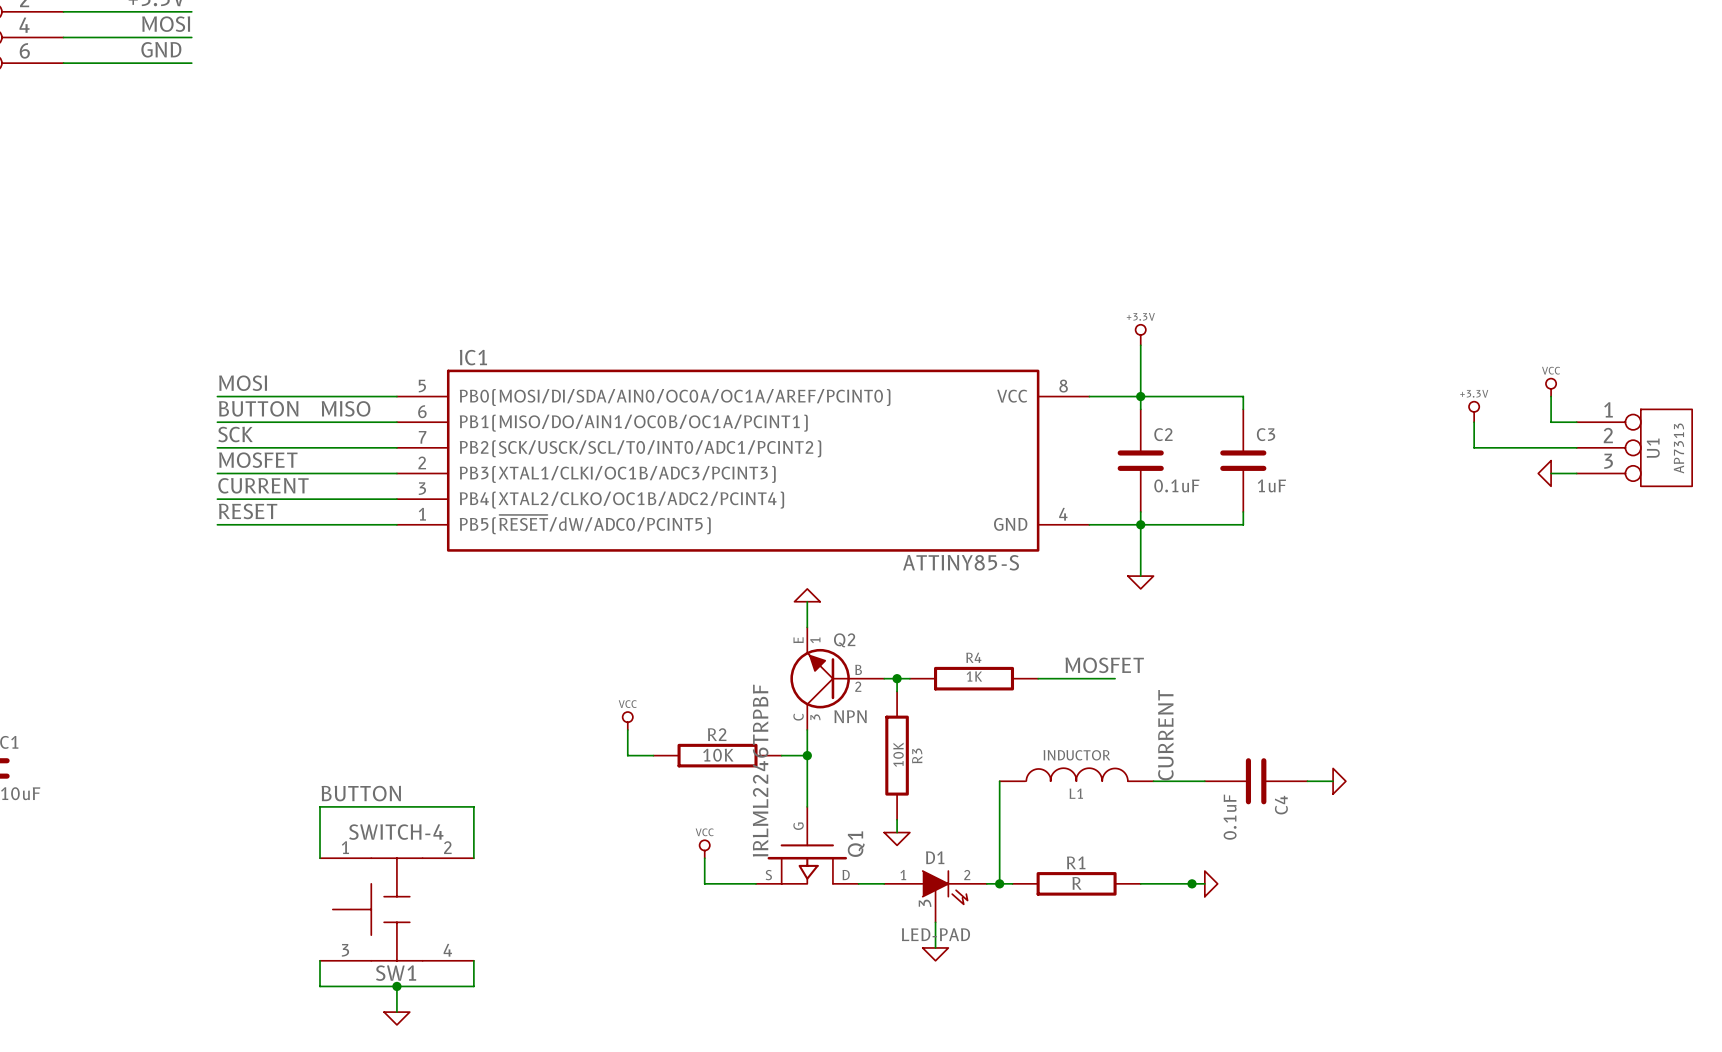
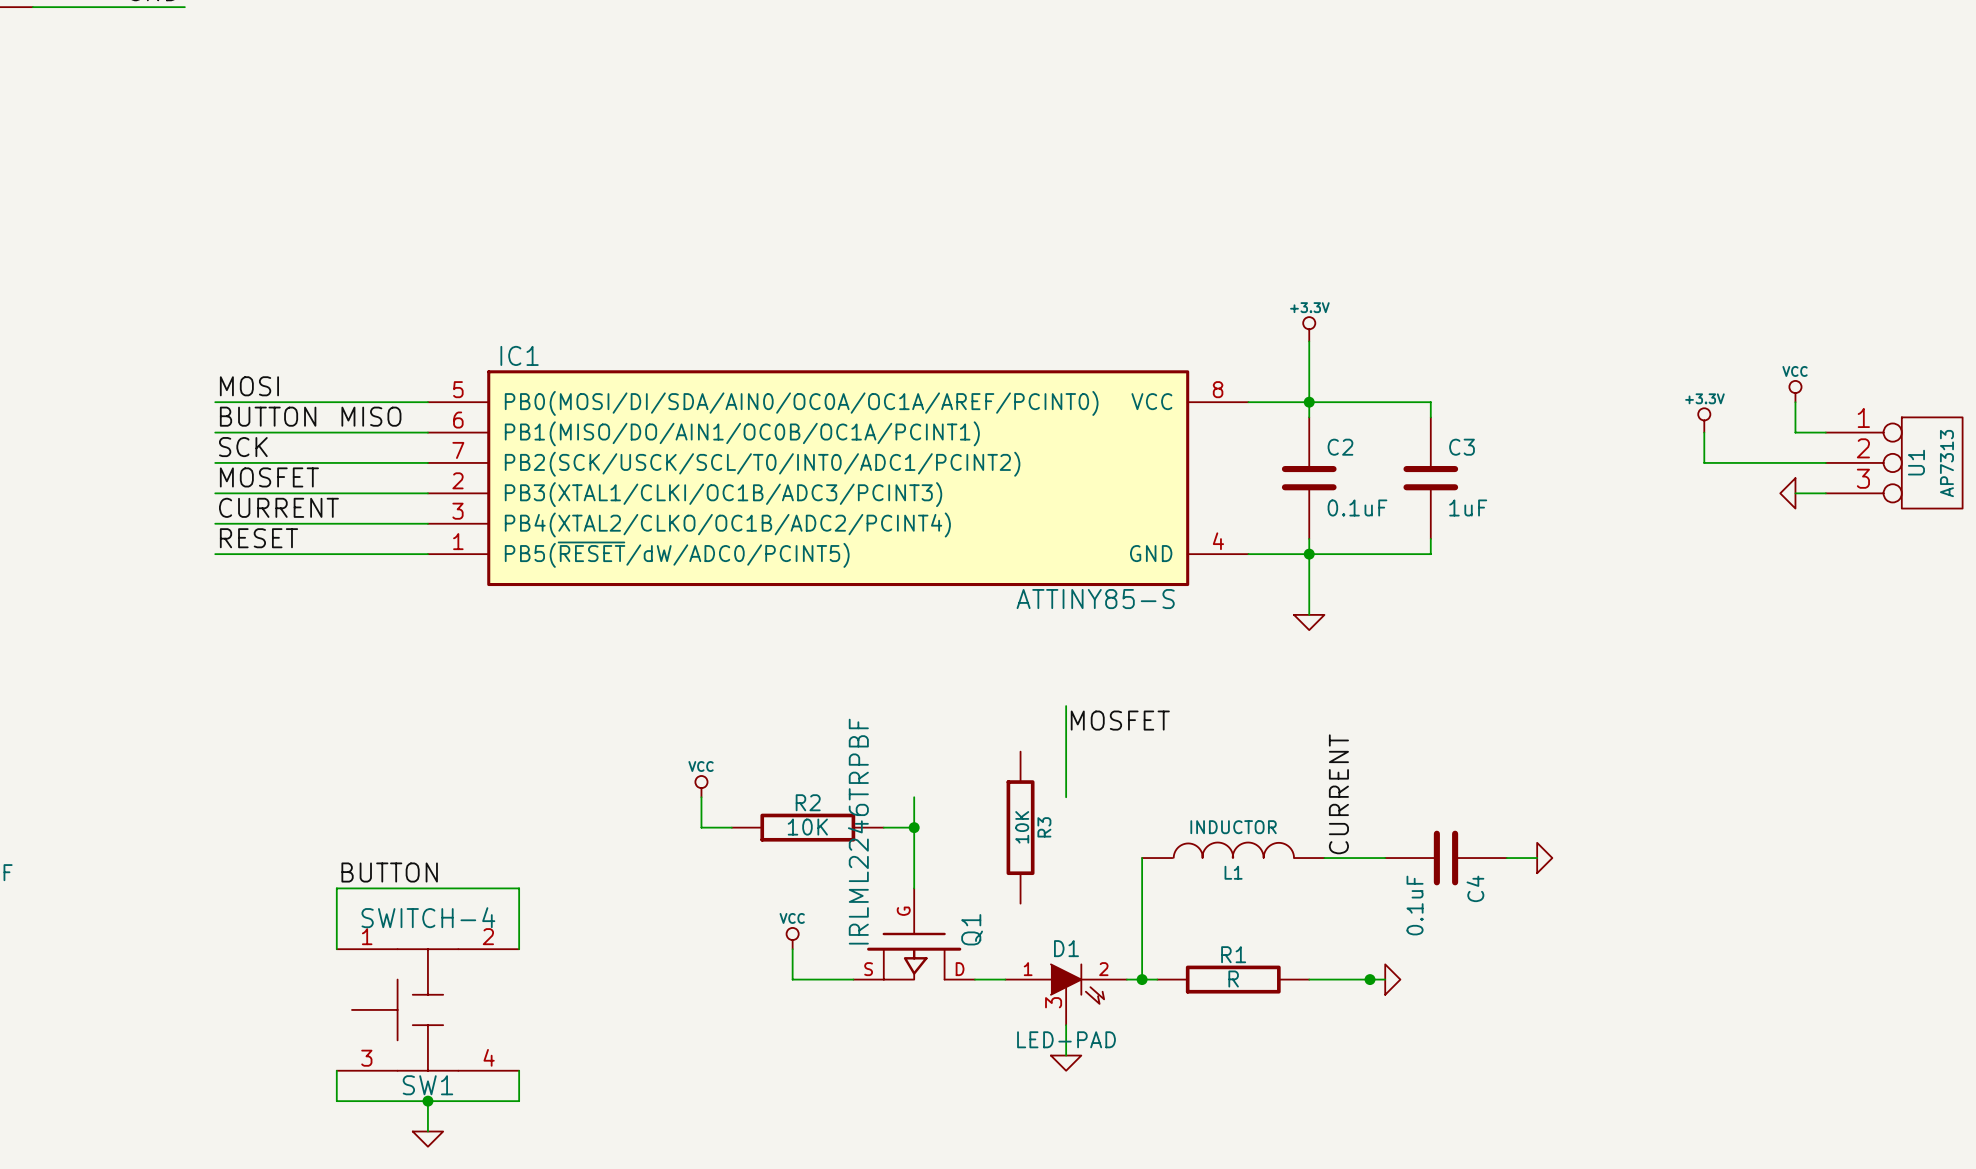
power symbol: (807, 595) -> none
wire: (807, 601) (807, 627) -> none
wire: none -> (1066, 706) (1066, 797)
label position: MOSFET (1104, 665) -> MOSFET (1120, 720)
Q2: NPN (837, 678) -> none
wire: (884, 678) (909, 678) -> none
wire: (897, 678) (897, 691) -> none
junction: (897, 678) -> none
R4: 1K (974, 678) -> none
wire: (1038, 678) (1115, 678) -> none
wire: (897, 819) (897, 832) -> none
power symbol: (897, 838) -> none

